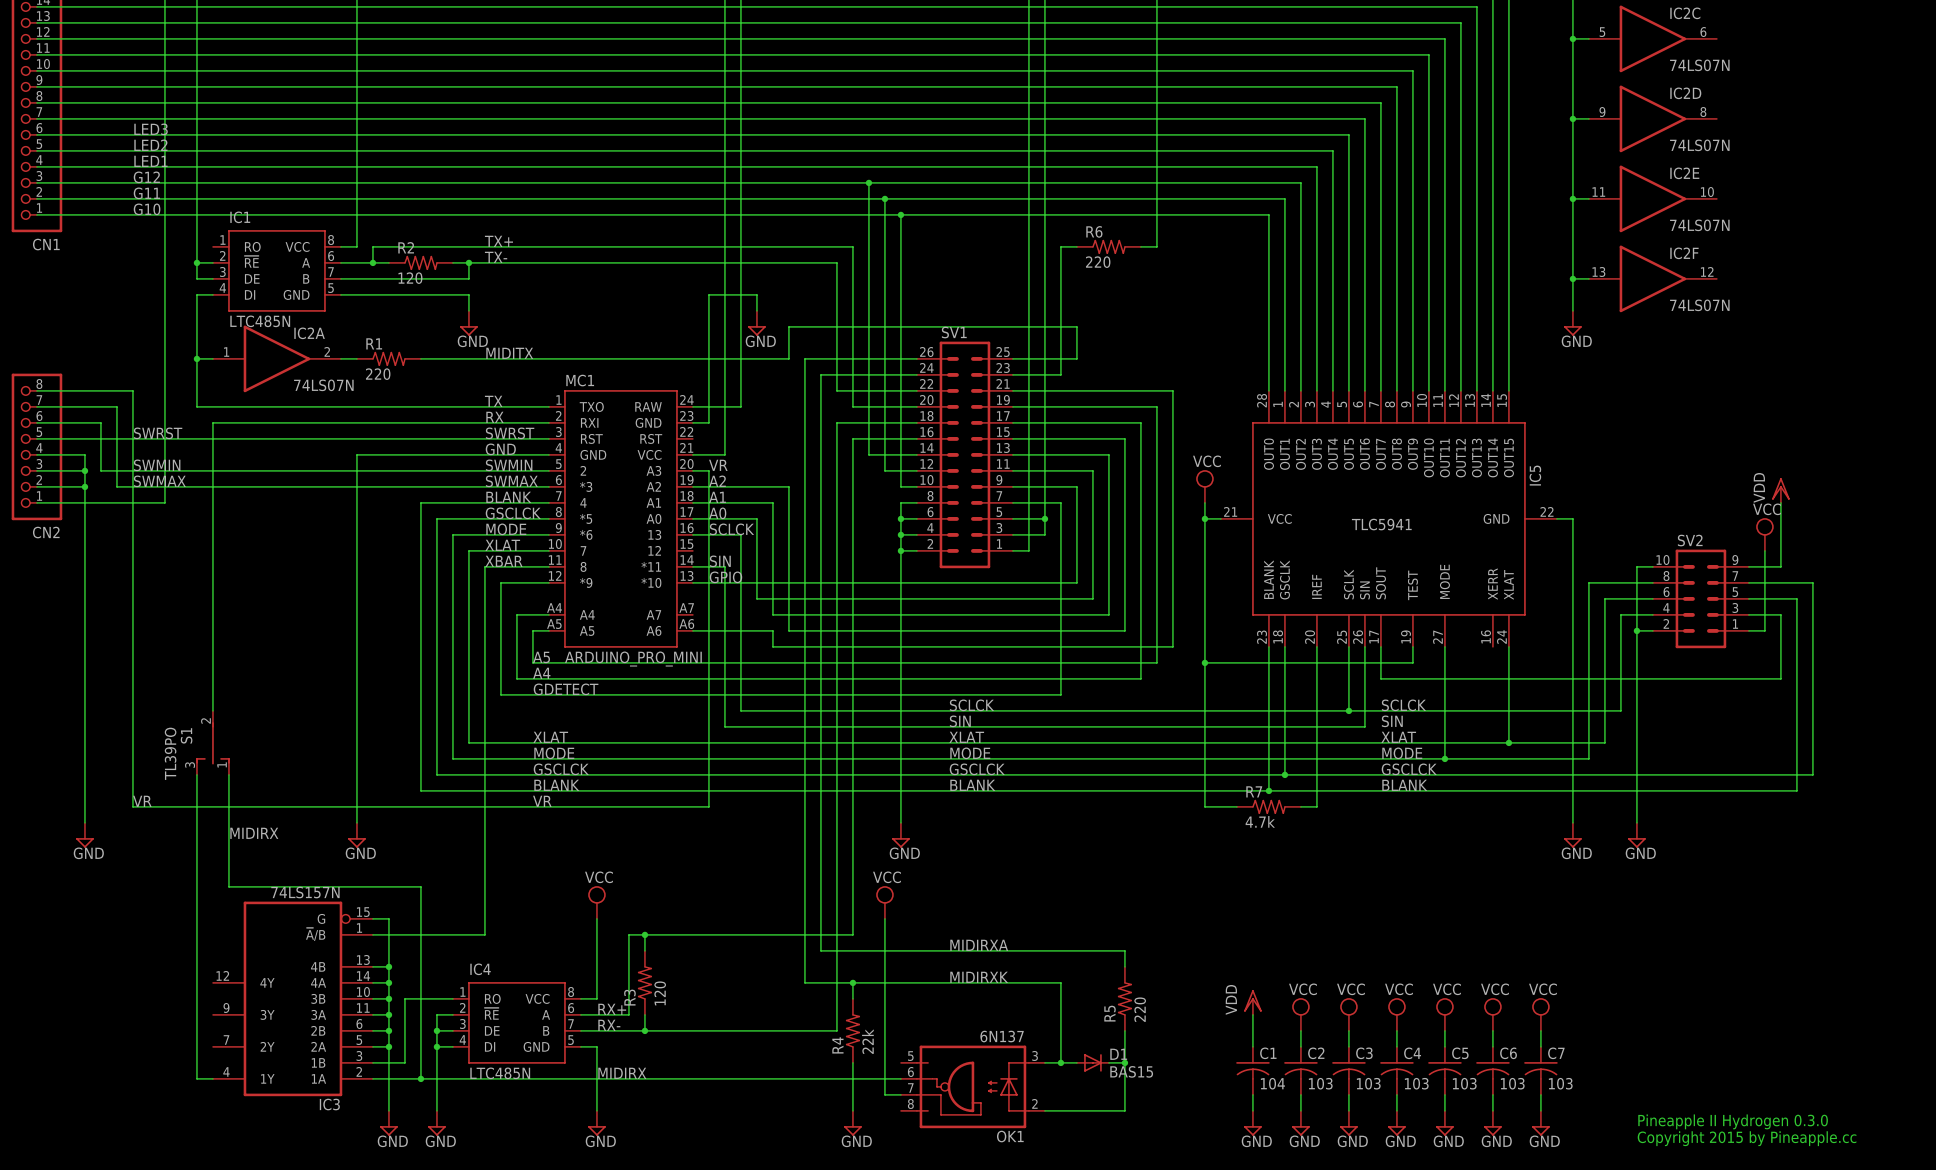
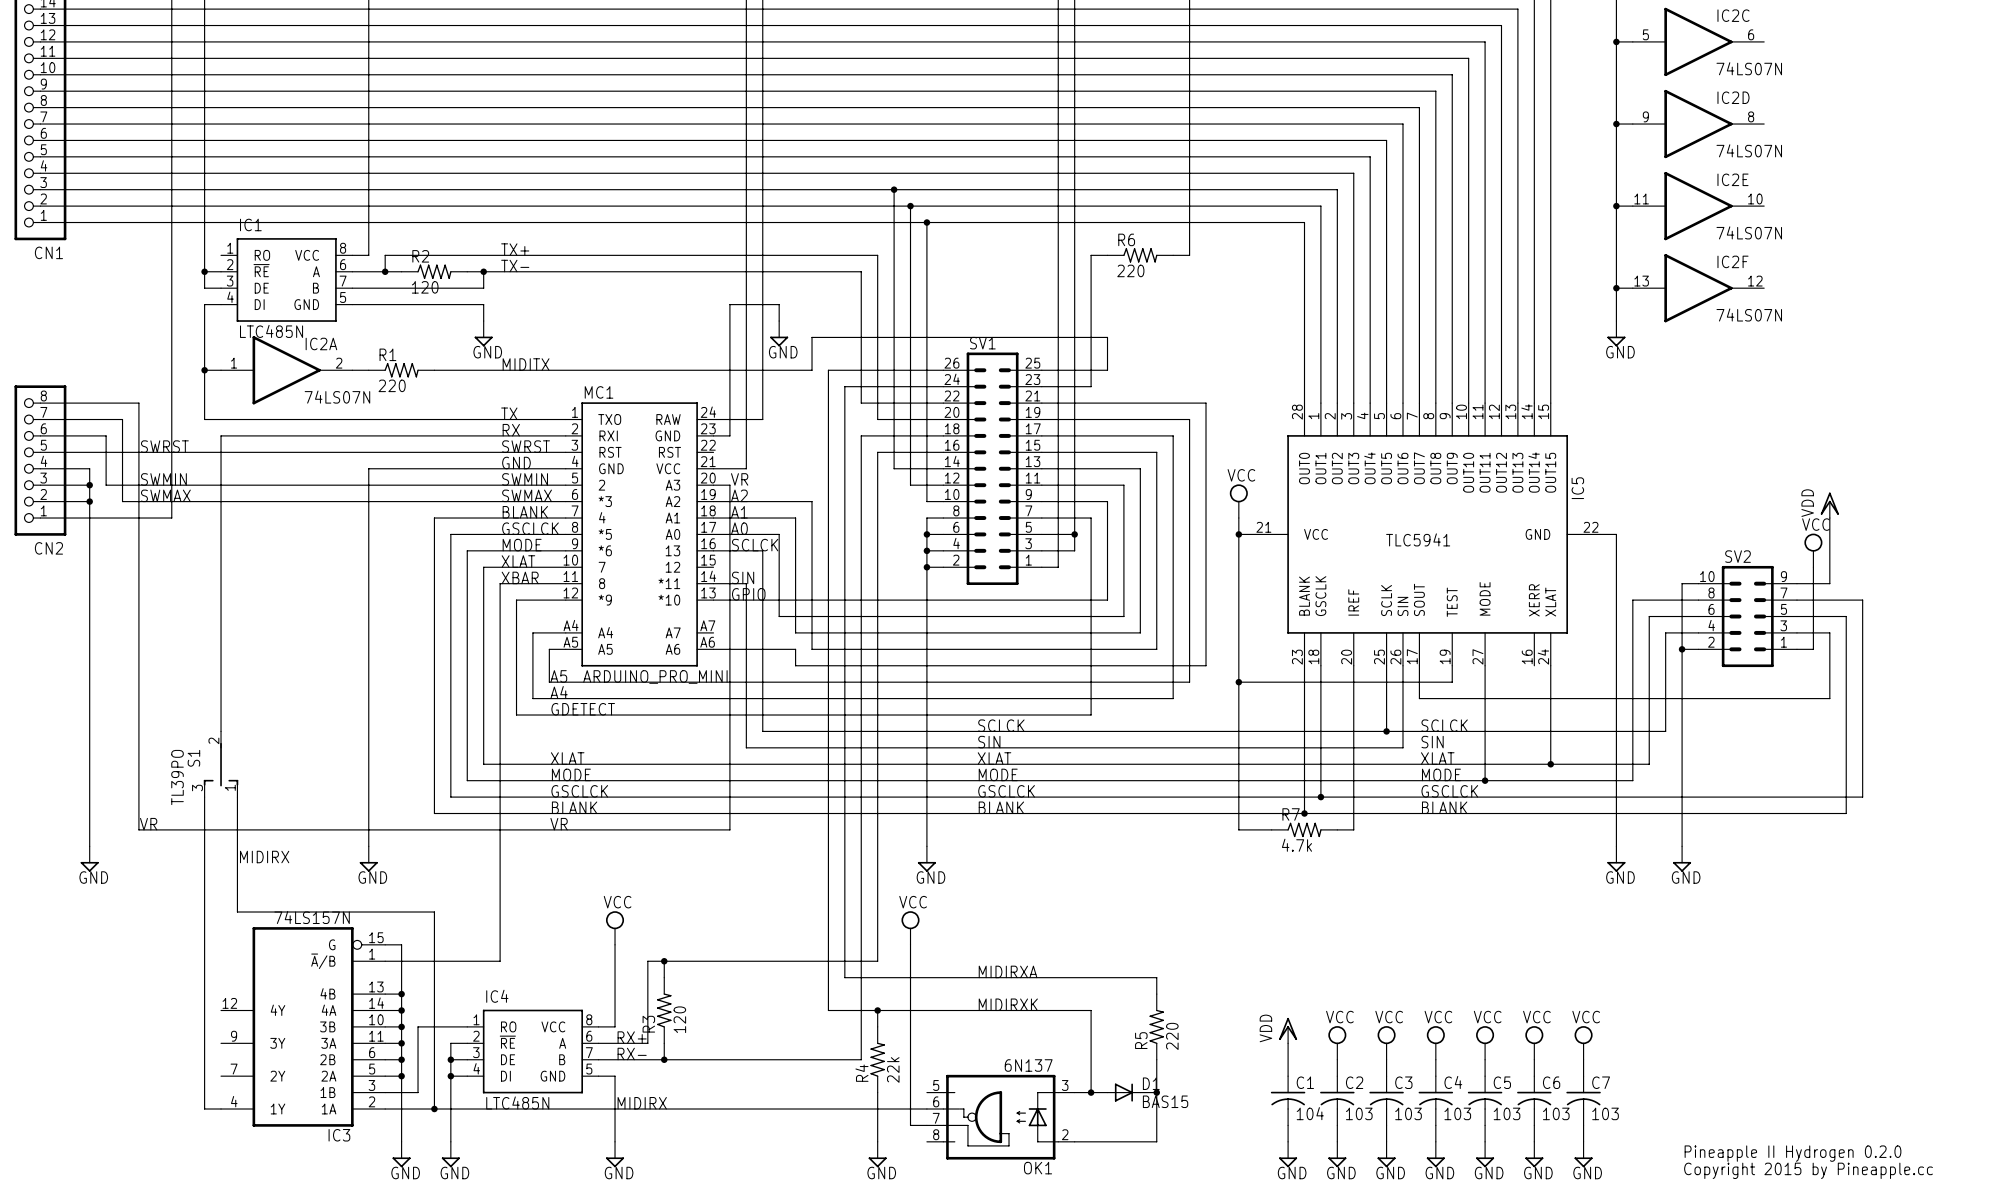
label: LED3 (151, 129) -> none
label: LED2 (150, 145) -> none
label: LED1 (150, 161) -> none
label: G12 (146, 177) -> none
label: G11 (146, 193) -> none
label: G10 (147, 209) -> none
text: Pineapple II Hydrogen 0.3.0 (1733, 1121) -> Pineapple II Hydrogen 0.2.0 (1793, 1153)

